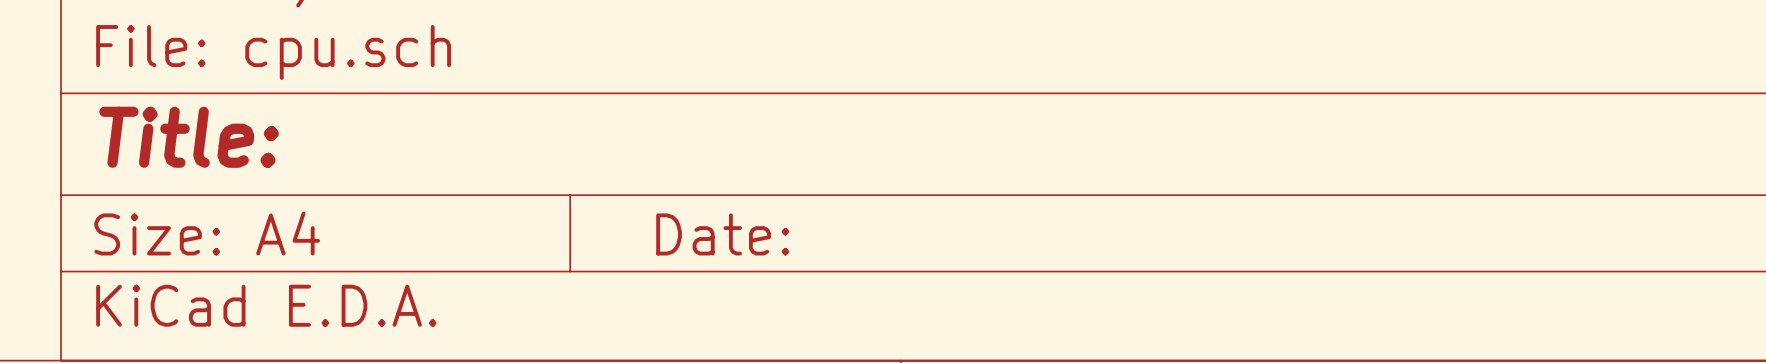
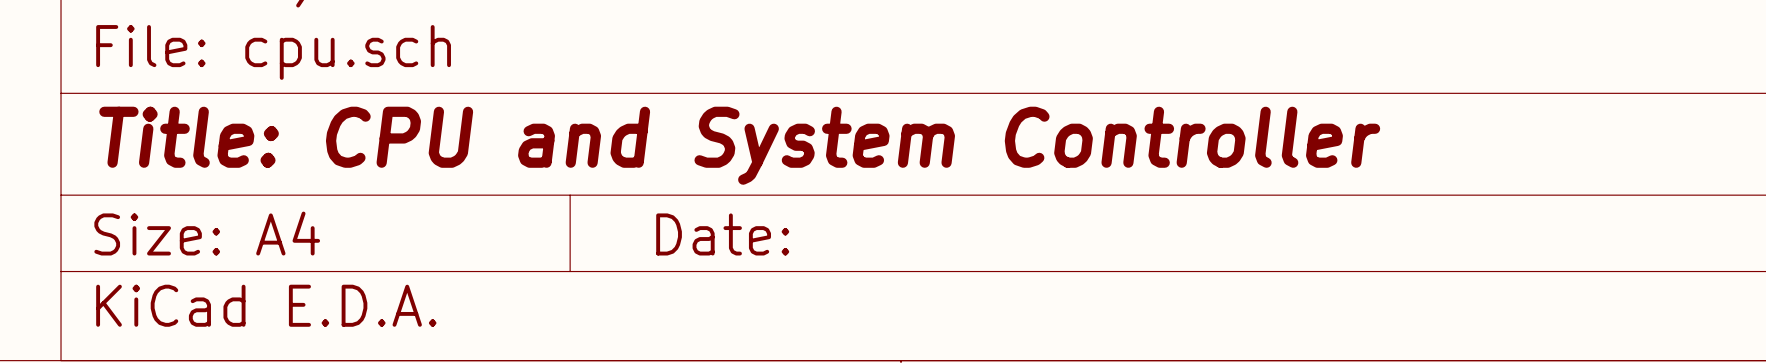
title block: Title: (189, 137) -> Title: CPU and System Controller (739, 145)

